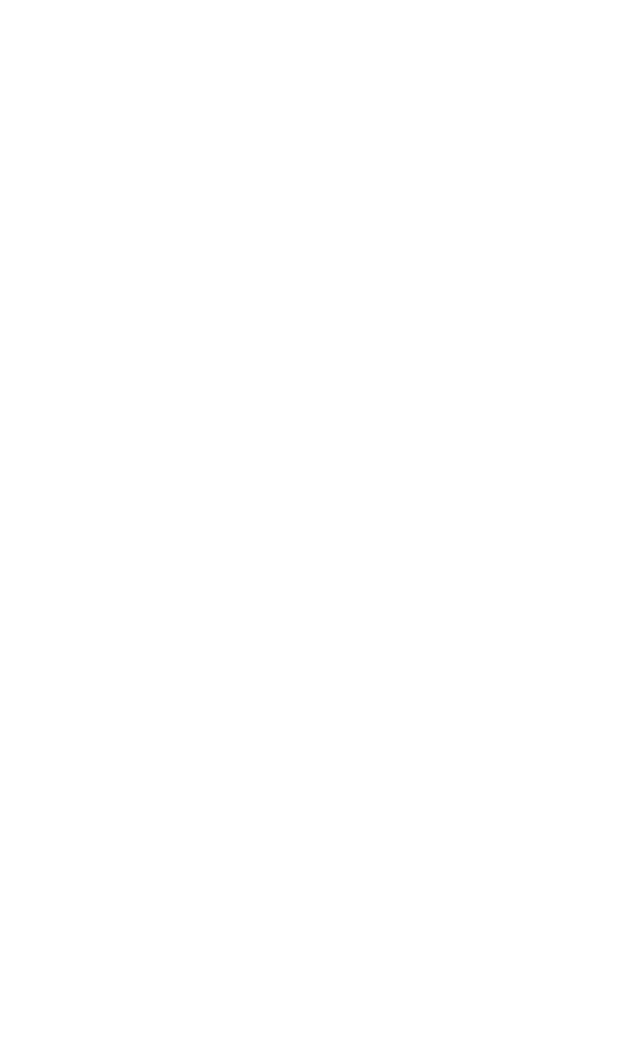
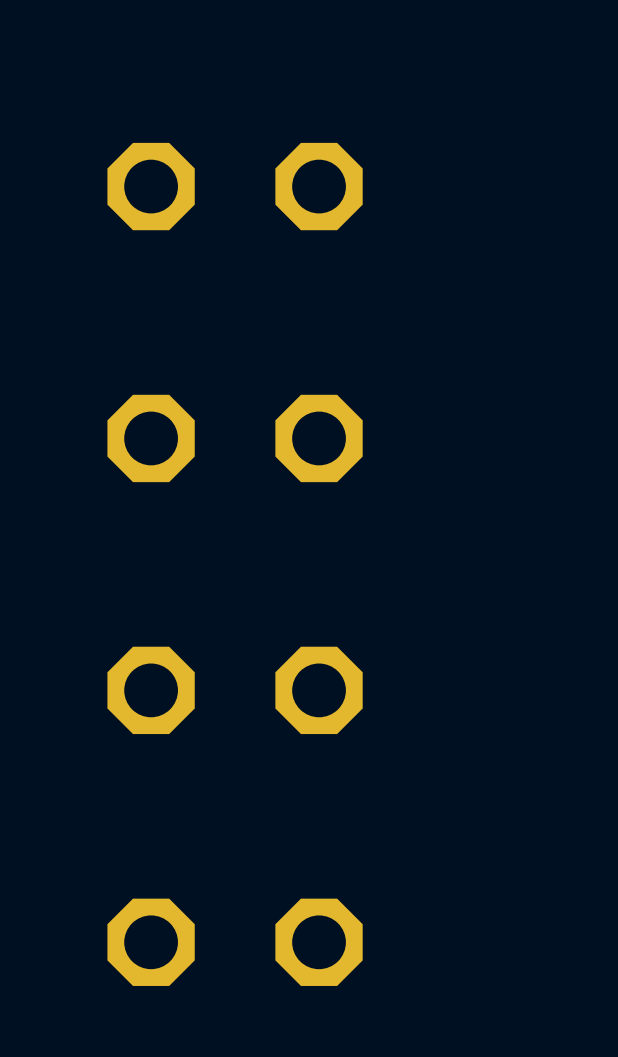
part: none -> (235, 186)
part: none -> (235, 438)
part: none -> (235, 690)
part: none -> (235, 942)

